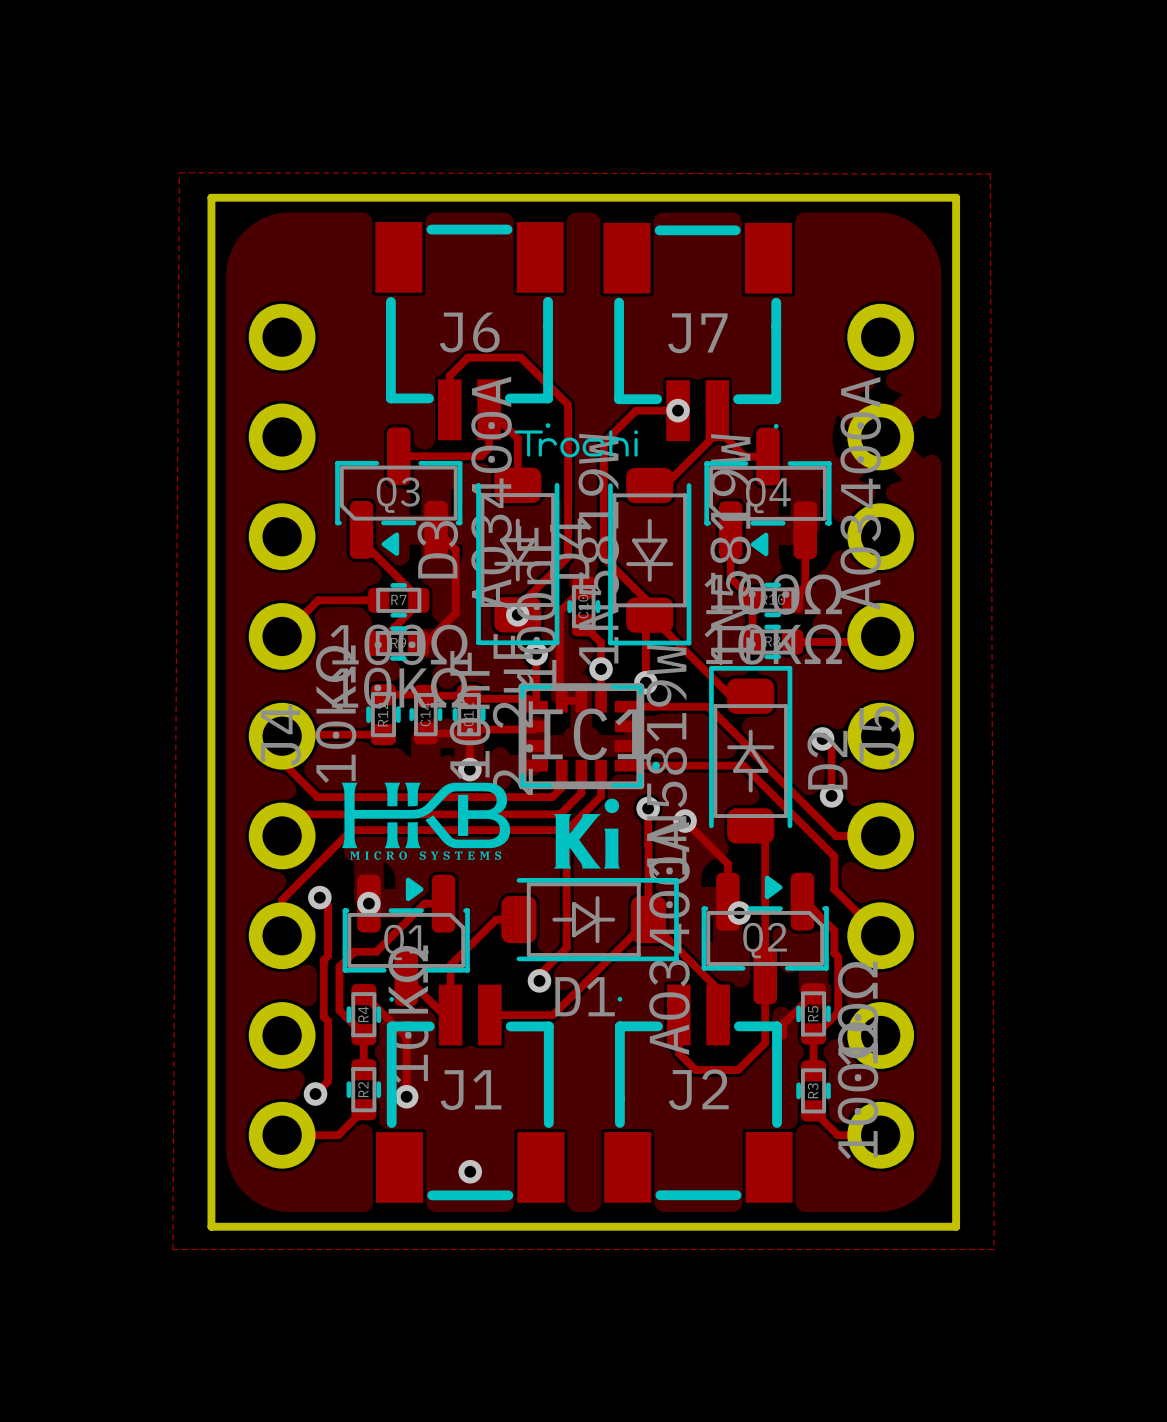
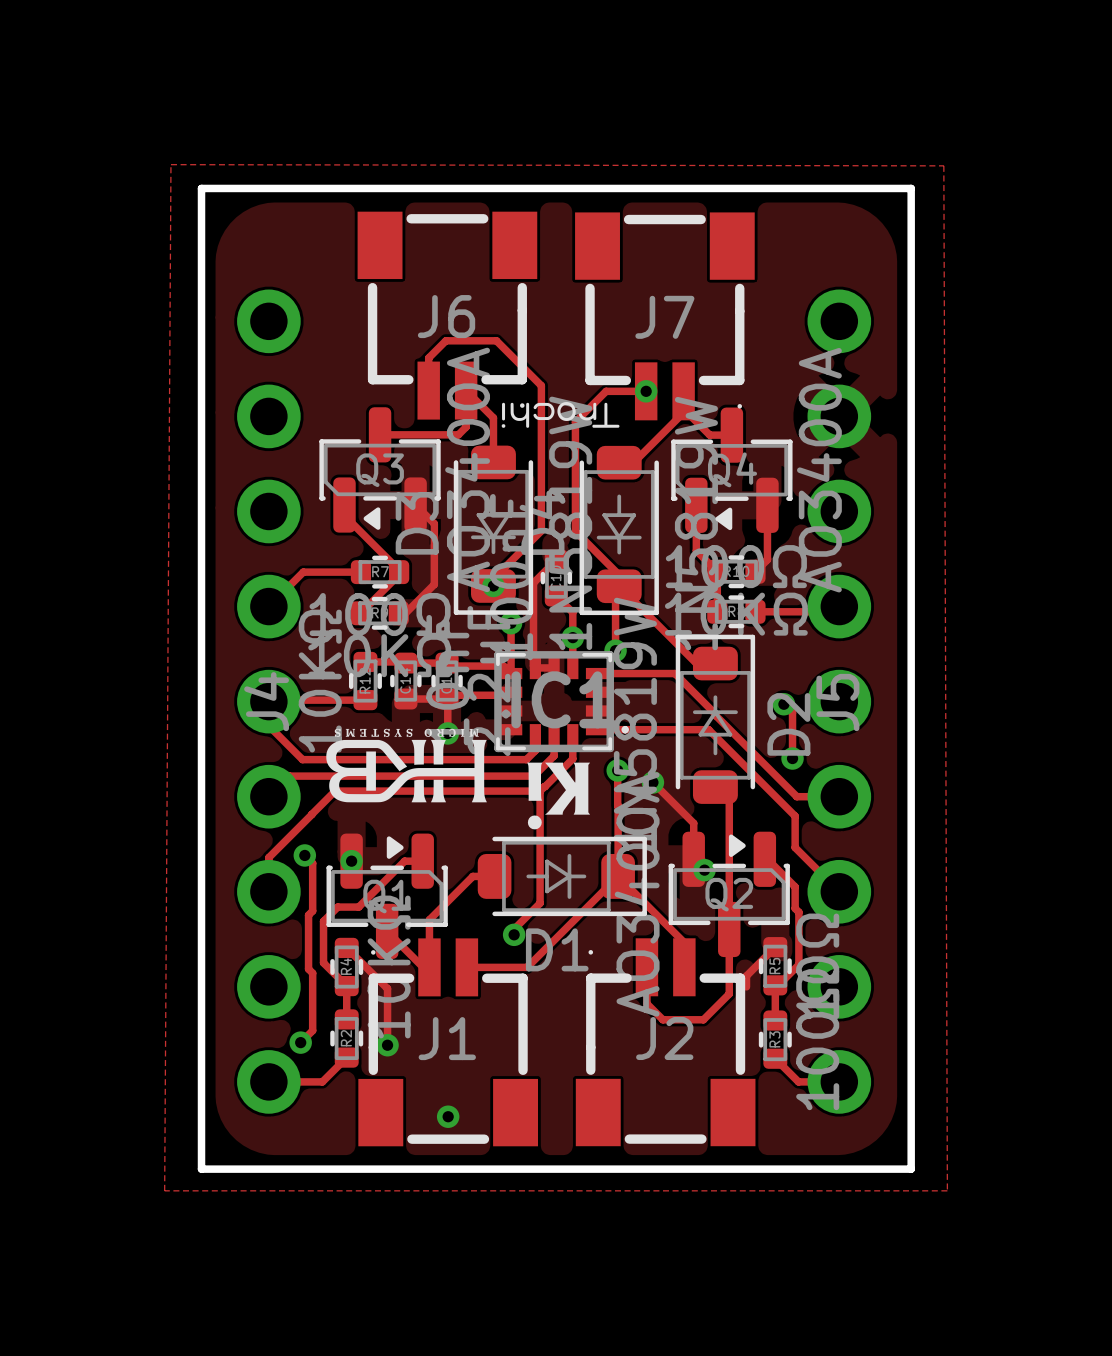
drawing shape: [514, 430, 639, 458] -> [501, 402, 620, 428]
drawing shape: [341, 782, 511, 860] -> [326, 728, 487, 803]
drawing shape: [553, 798, 620, 869] -> [527, 762, 591, 830]

